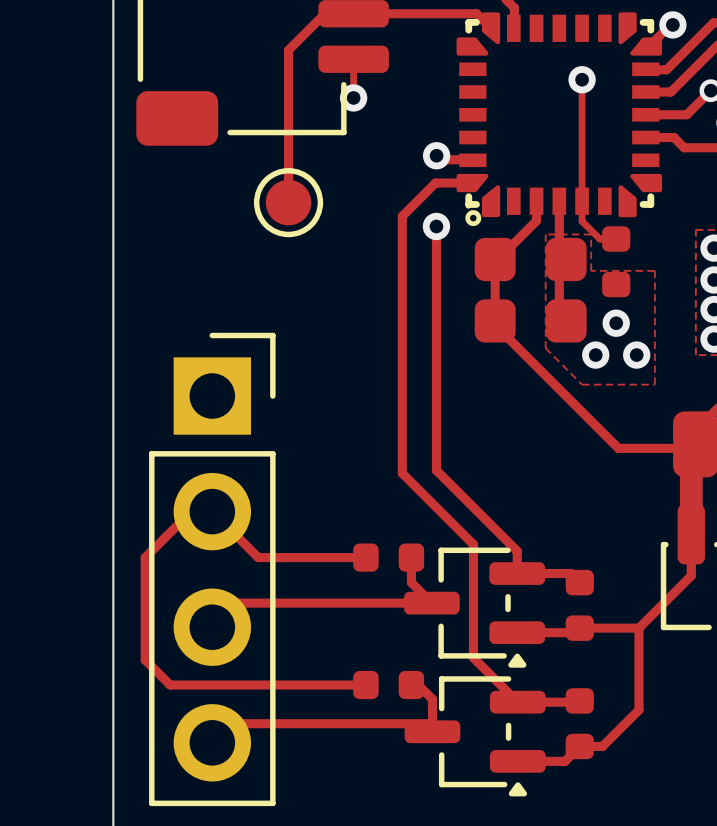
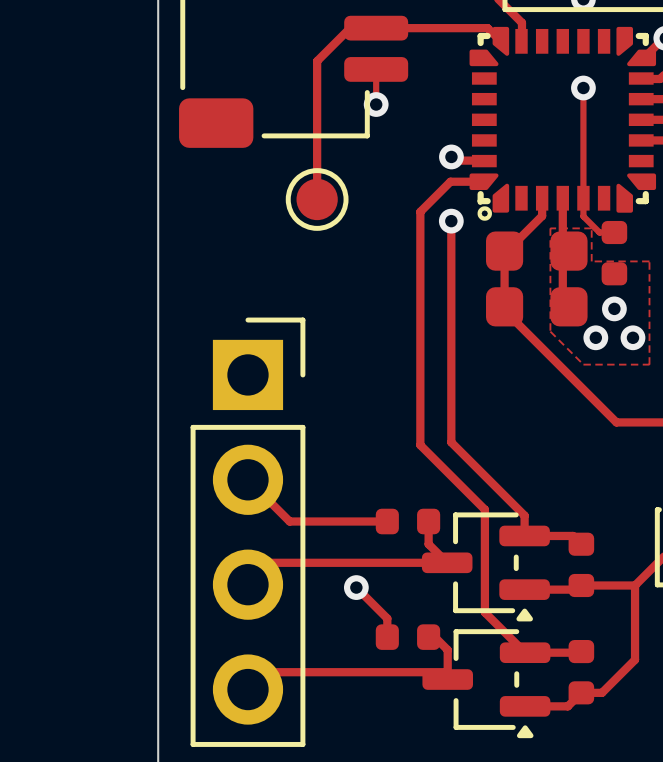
track: (191, 511) (145, 557) (145, 659) (170, 685) (365, 685) -> (356, 587) (387, 618) (387, 637)
via: none -> (356, 587)

